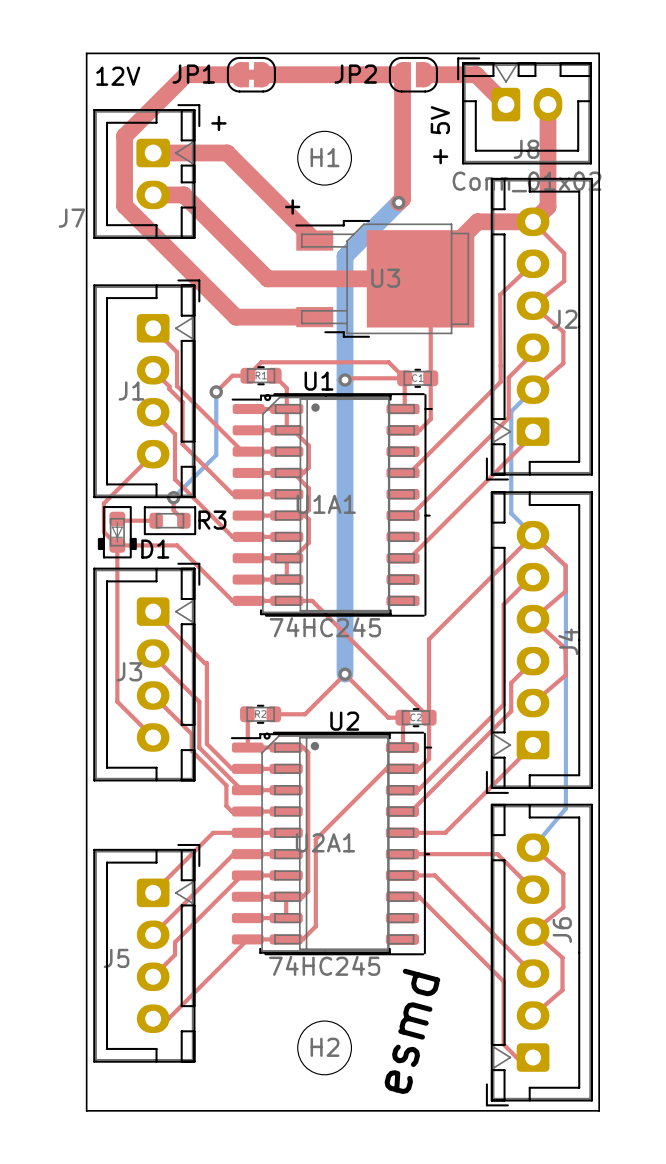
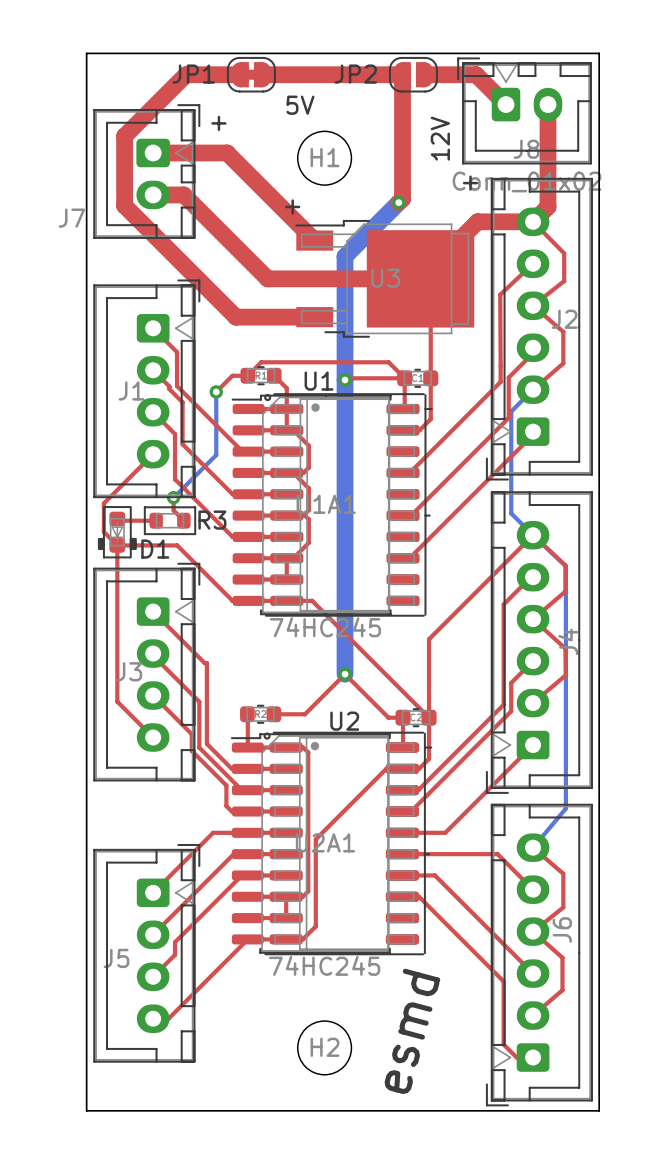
text rotation: 0° (118, 76) -> 90° counterclockwise (440, 138)
text position: 12V (118, 76) -> 12V (440, 138)
text rotation: 0° (440, 120) -> 90° clockwise (300, 105)
text position: 5V (440, 120) -> 5V (300, 105)
text position: + (440, 156) -> + (470, 183)

